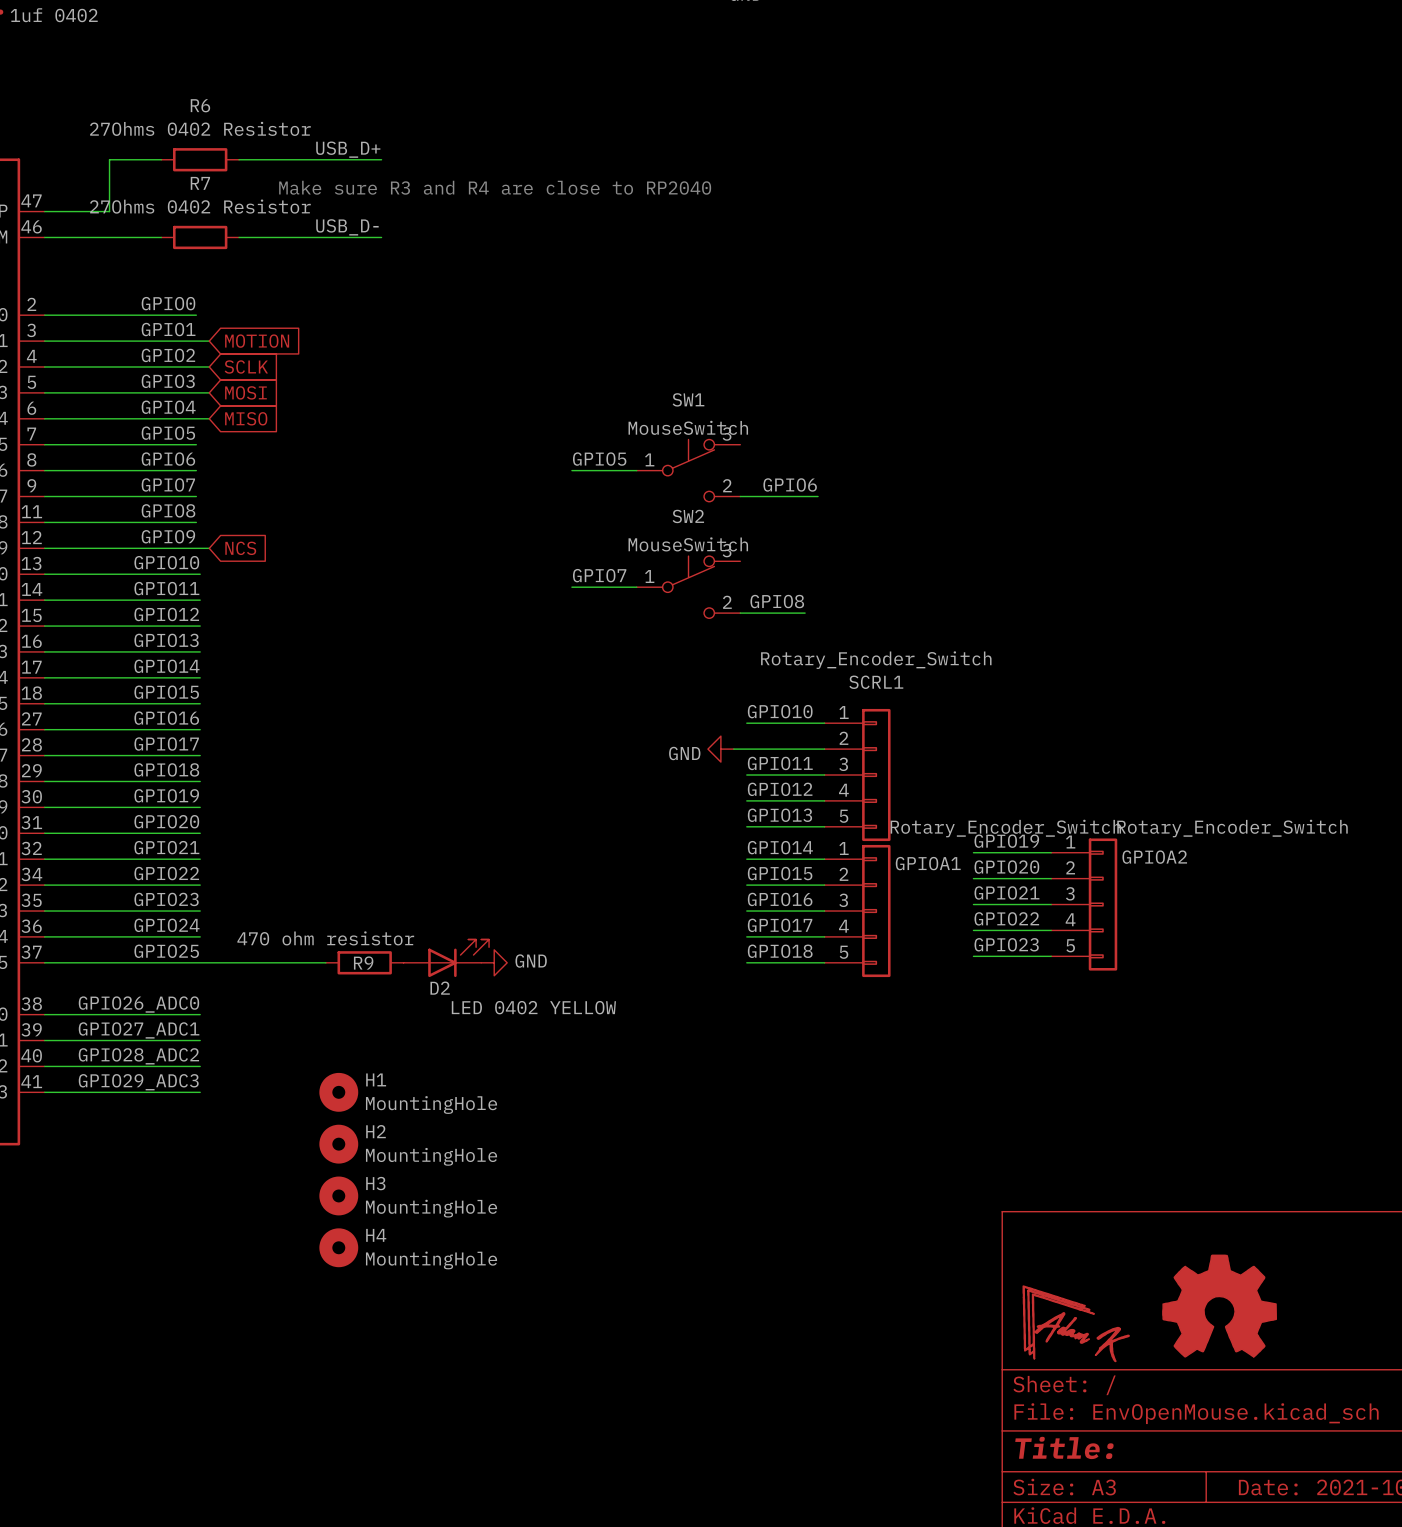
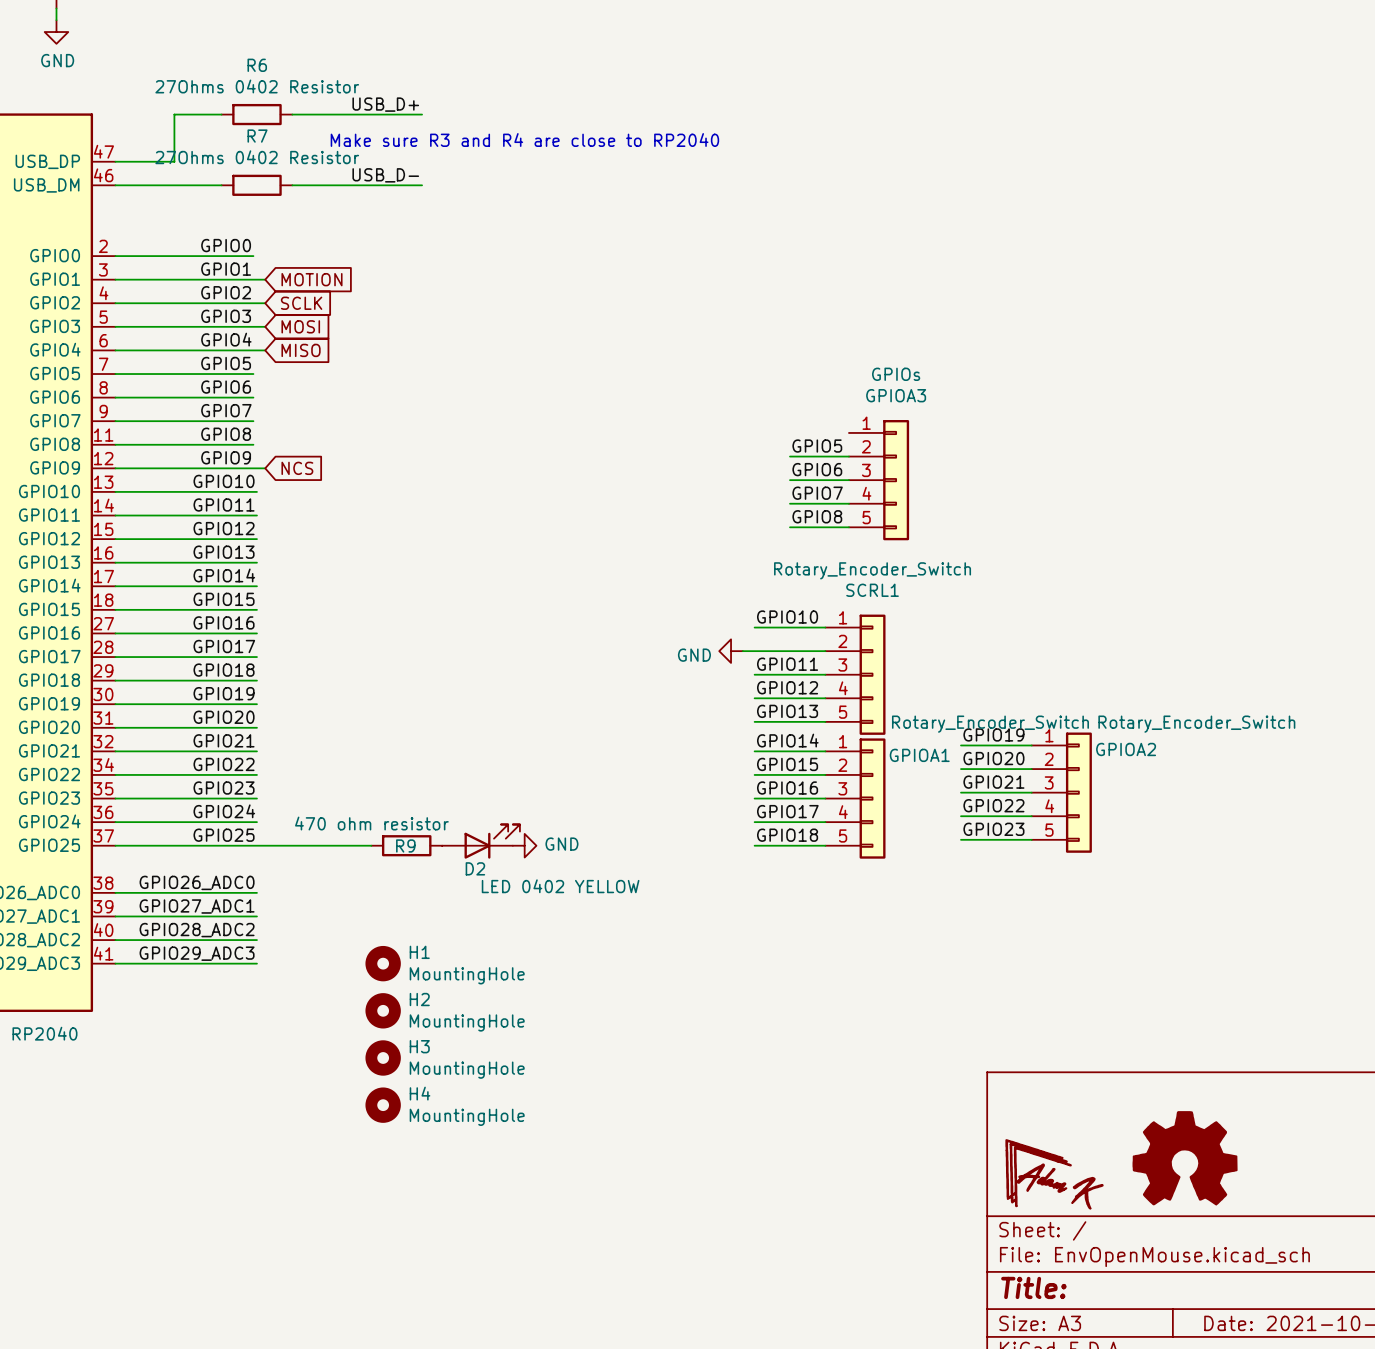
label position: GPIO5 (599, 459) -> GPIO5 (817, 446)
wire: (571, 470) (636, 470) -> (789, 456) (848, 456)
SW1: MouseSwitch (688, 470) -> none
label position: GPIO6 (790, 484) -> GPIO6 (817, 469)
wire: (740, 496) (818, 496) -> none
wire: none -> (789, 480) (848, 480)
GPIOA3: none -> GPIOs (879, 480)
label position: GPIO7 (599, 575) -> GPIO7 (817, 493)
wire: (571, 587) (636, 587) -> (789, 503) (848, 503)
SW2: MouseSwitch (688, 587) -> none
label position: GPIO8 (777, 601) -> GPIO8 (817, 516)
wire: (740, 613) (785, 613) -> (807, 527) (848, 527)

